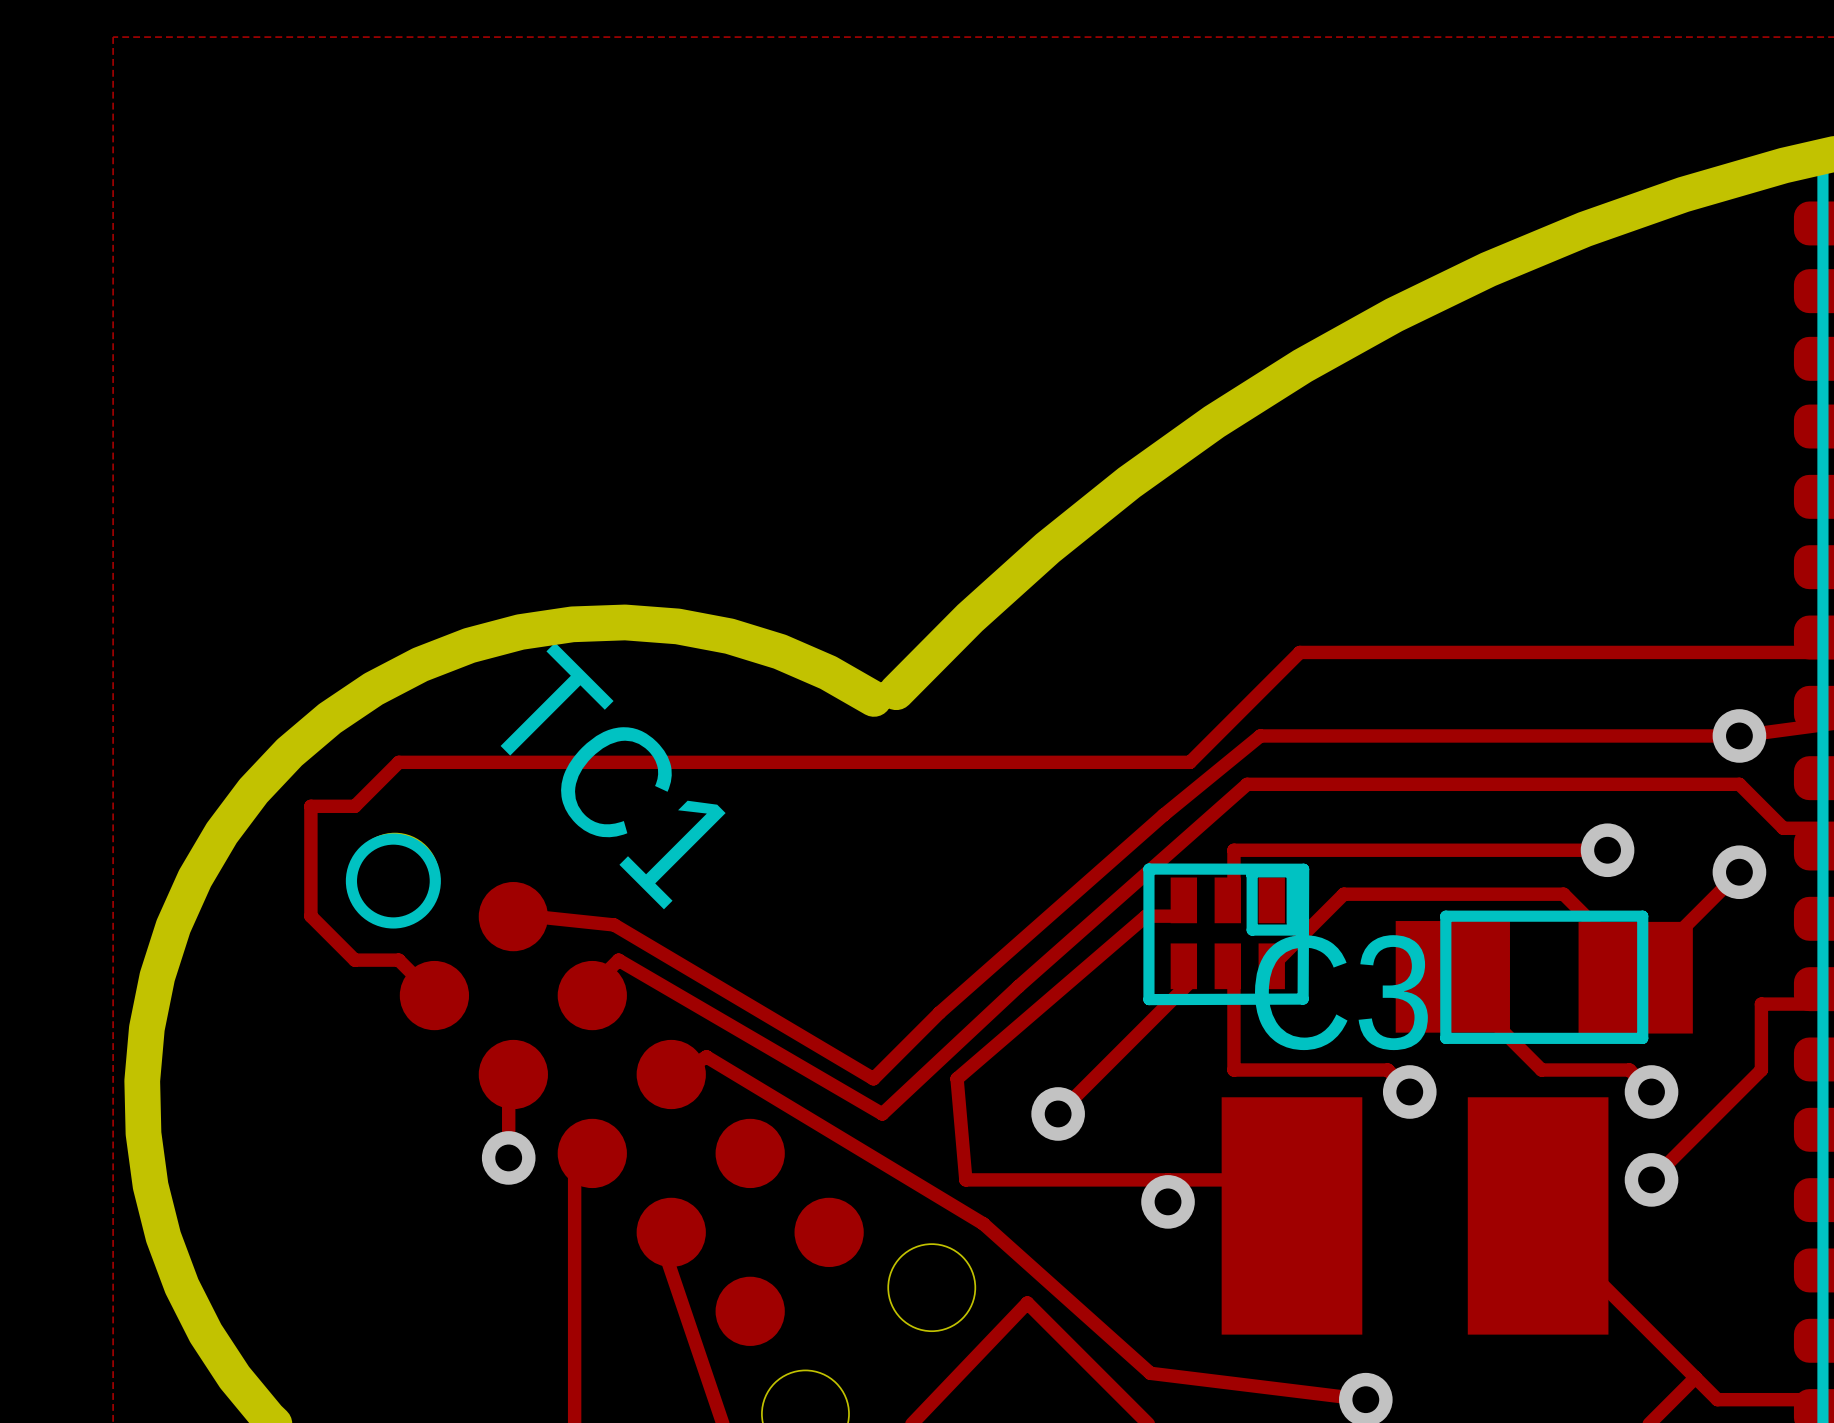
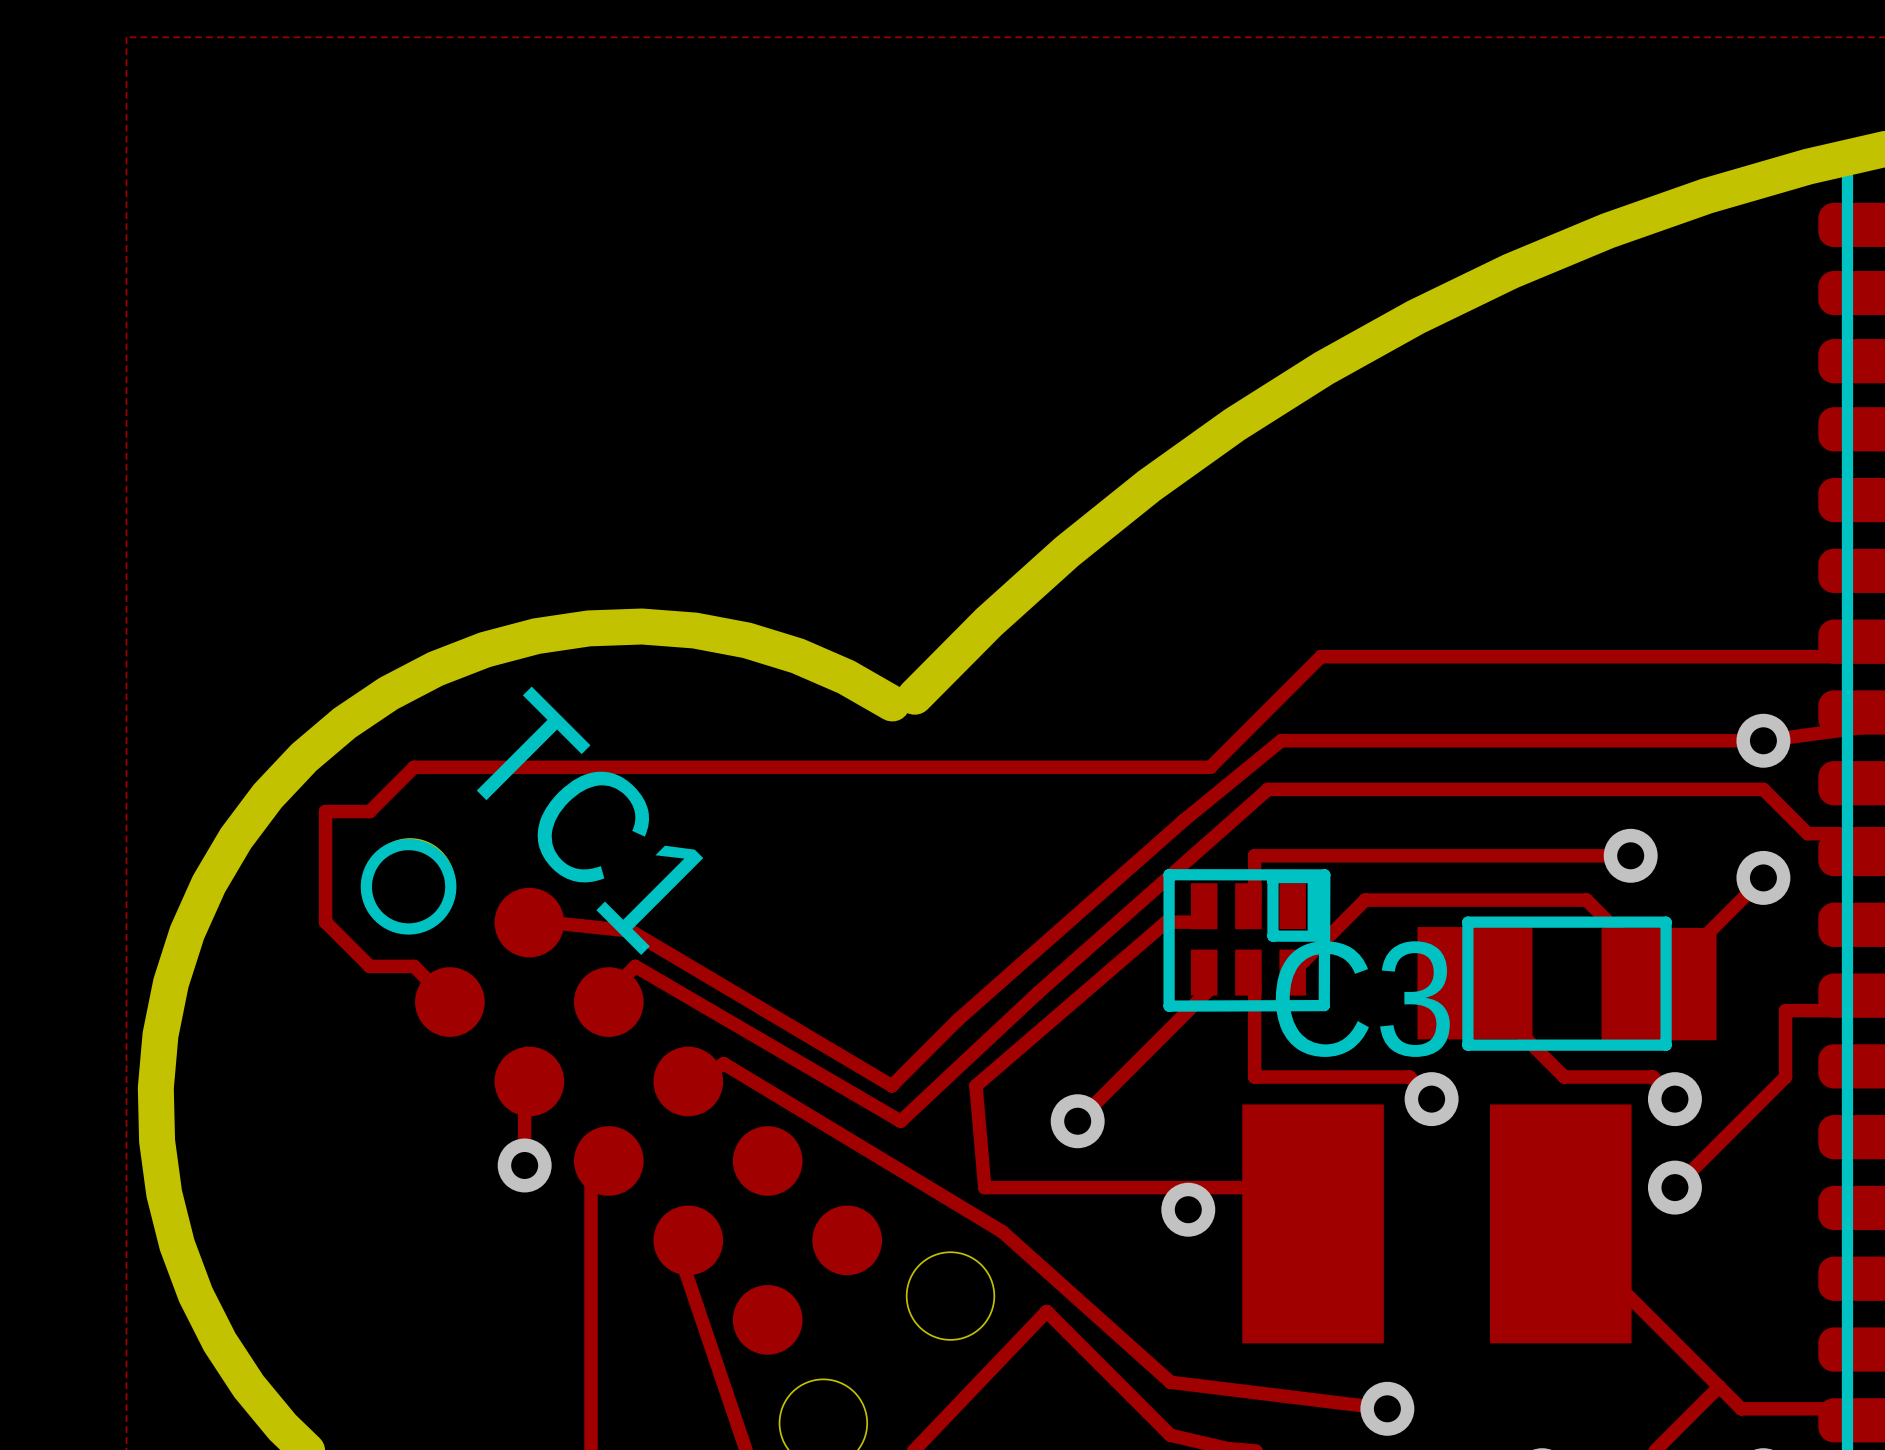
TC1 name position: TC1 (613, 775) -> TC1 (590, 820)

